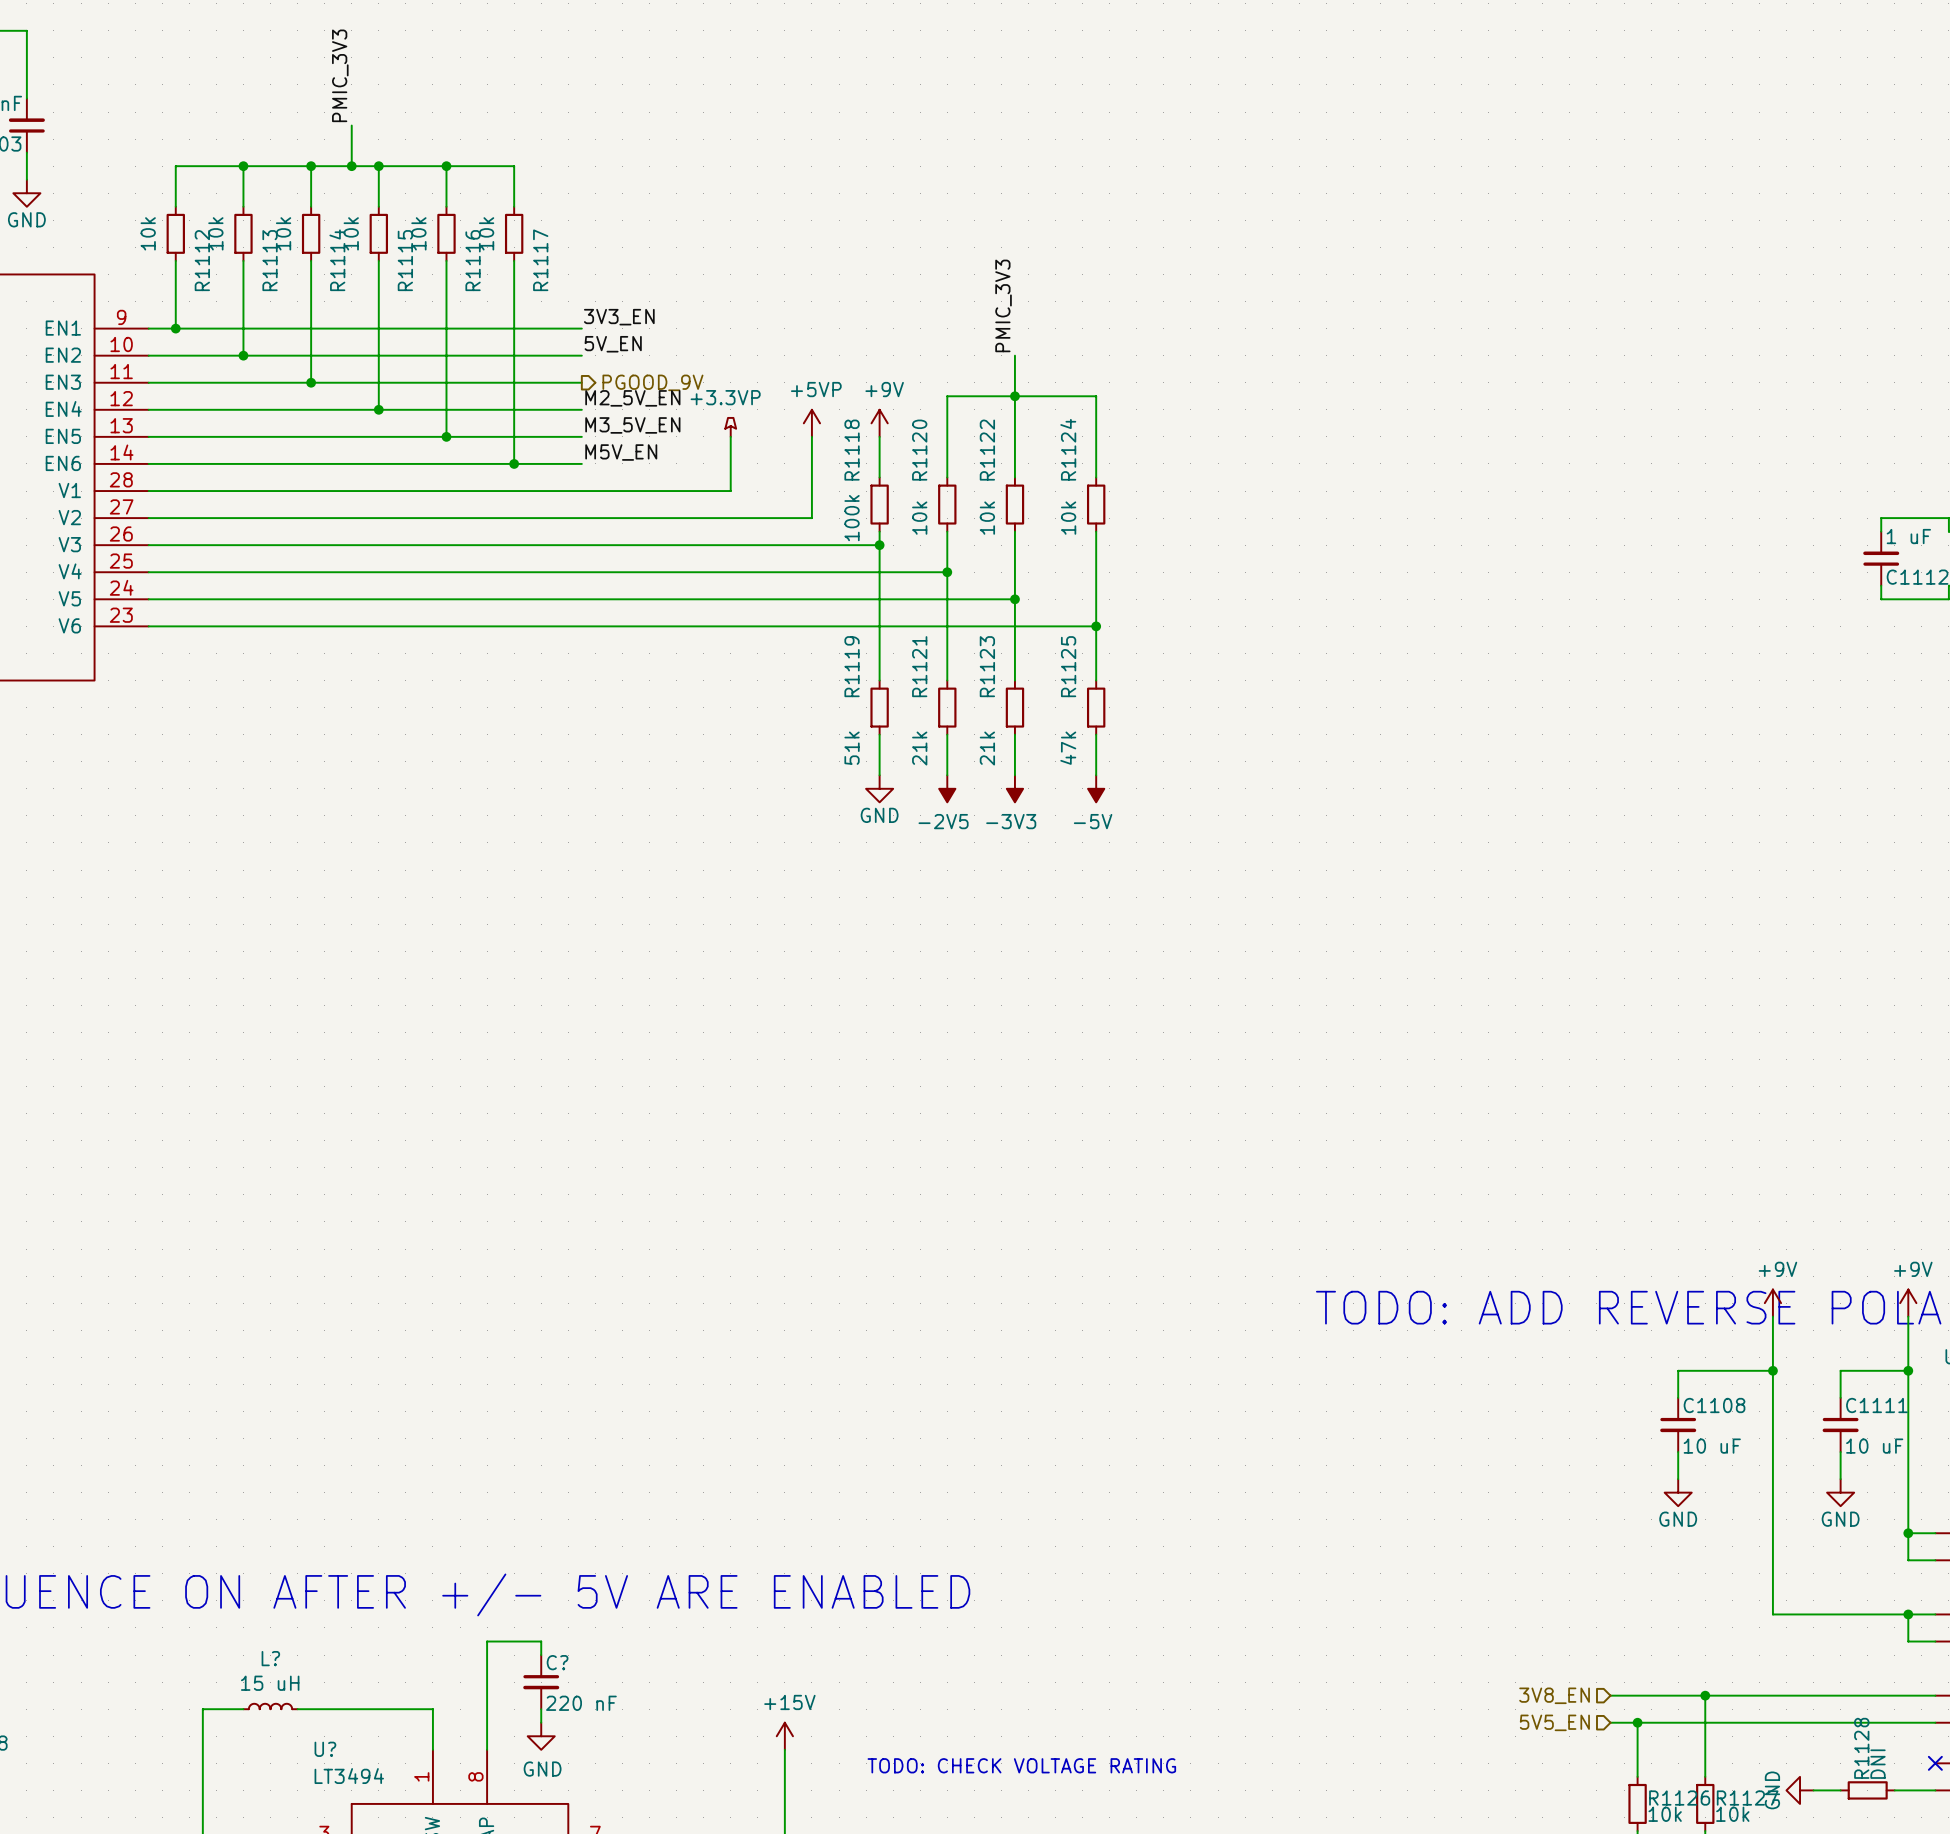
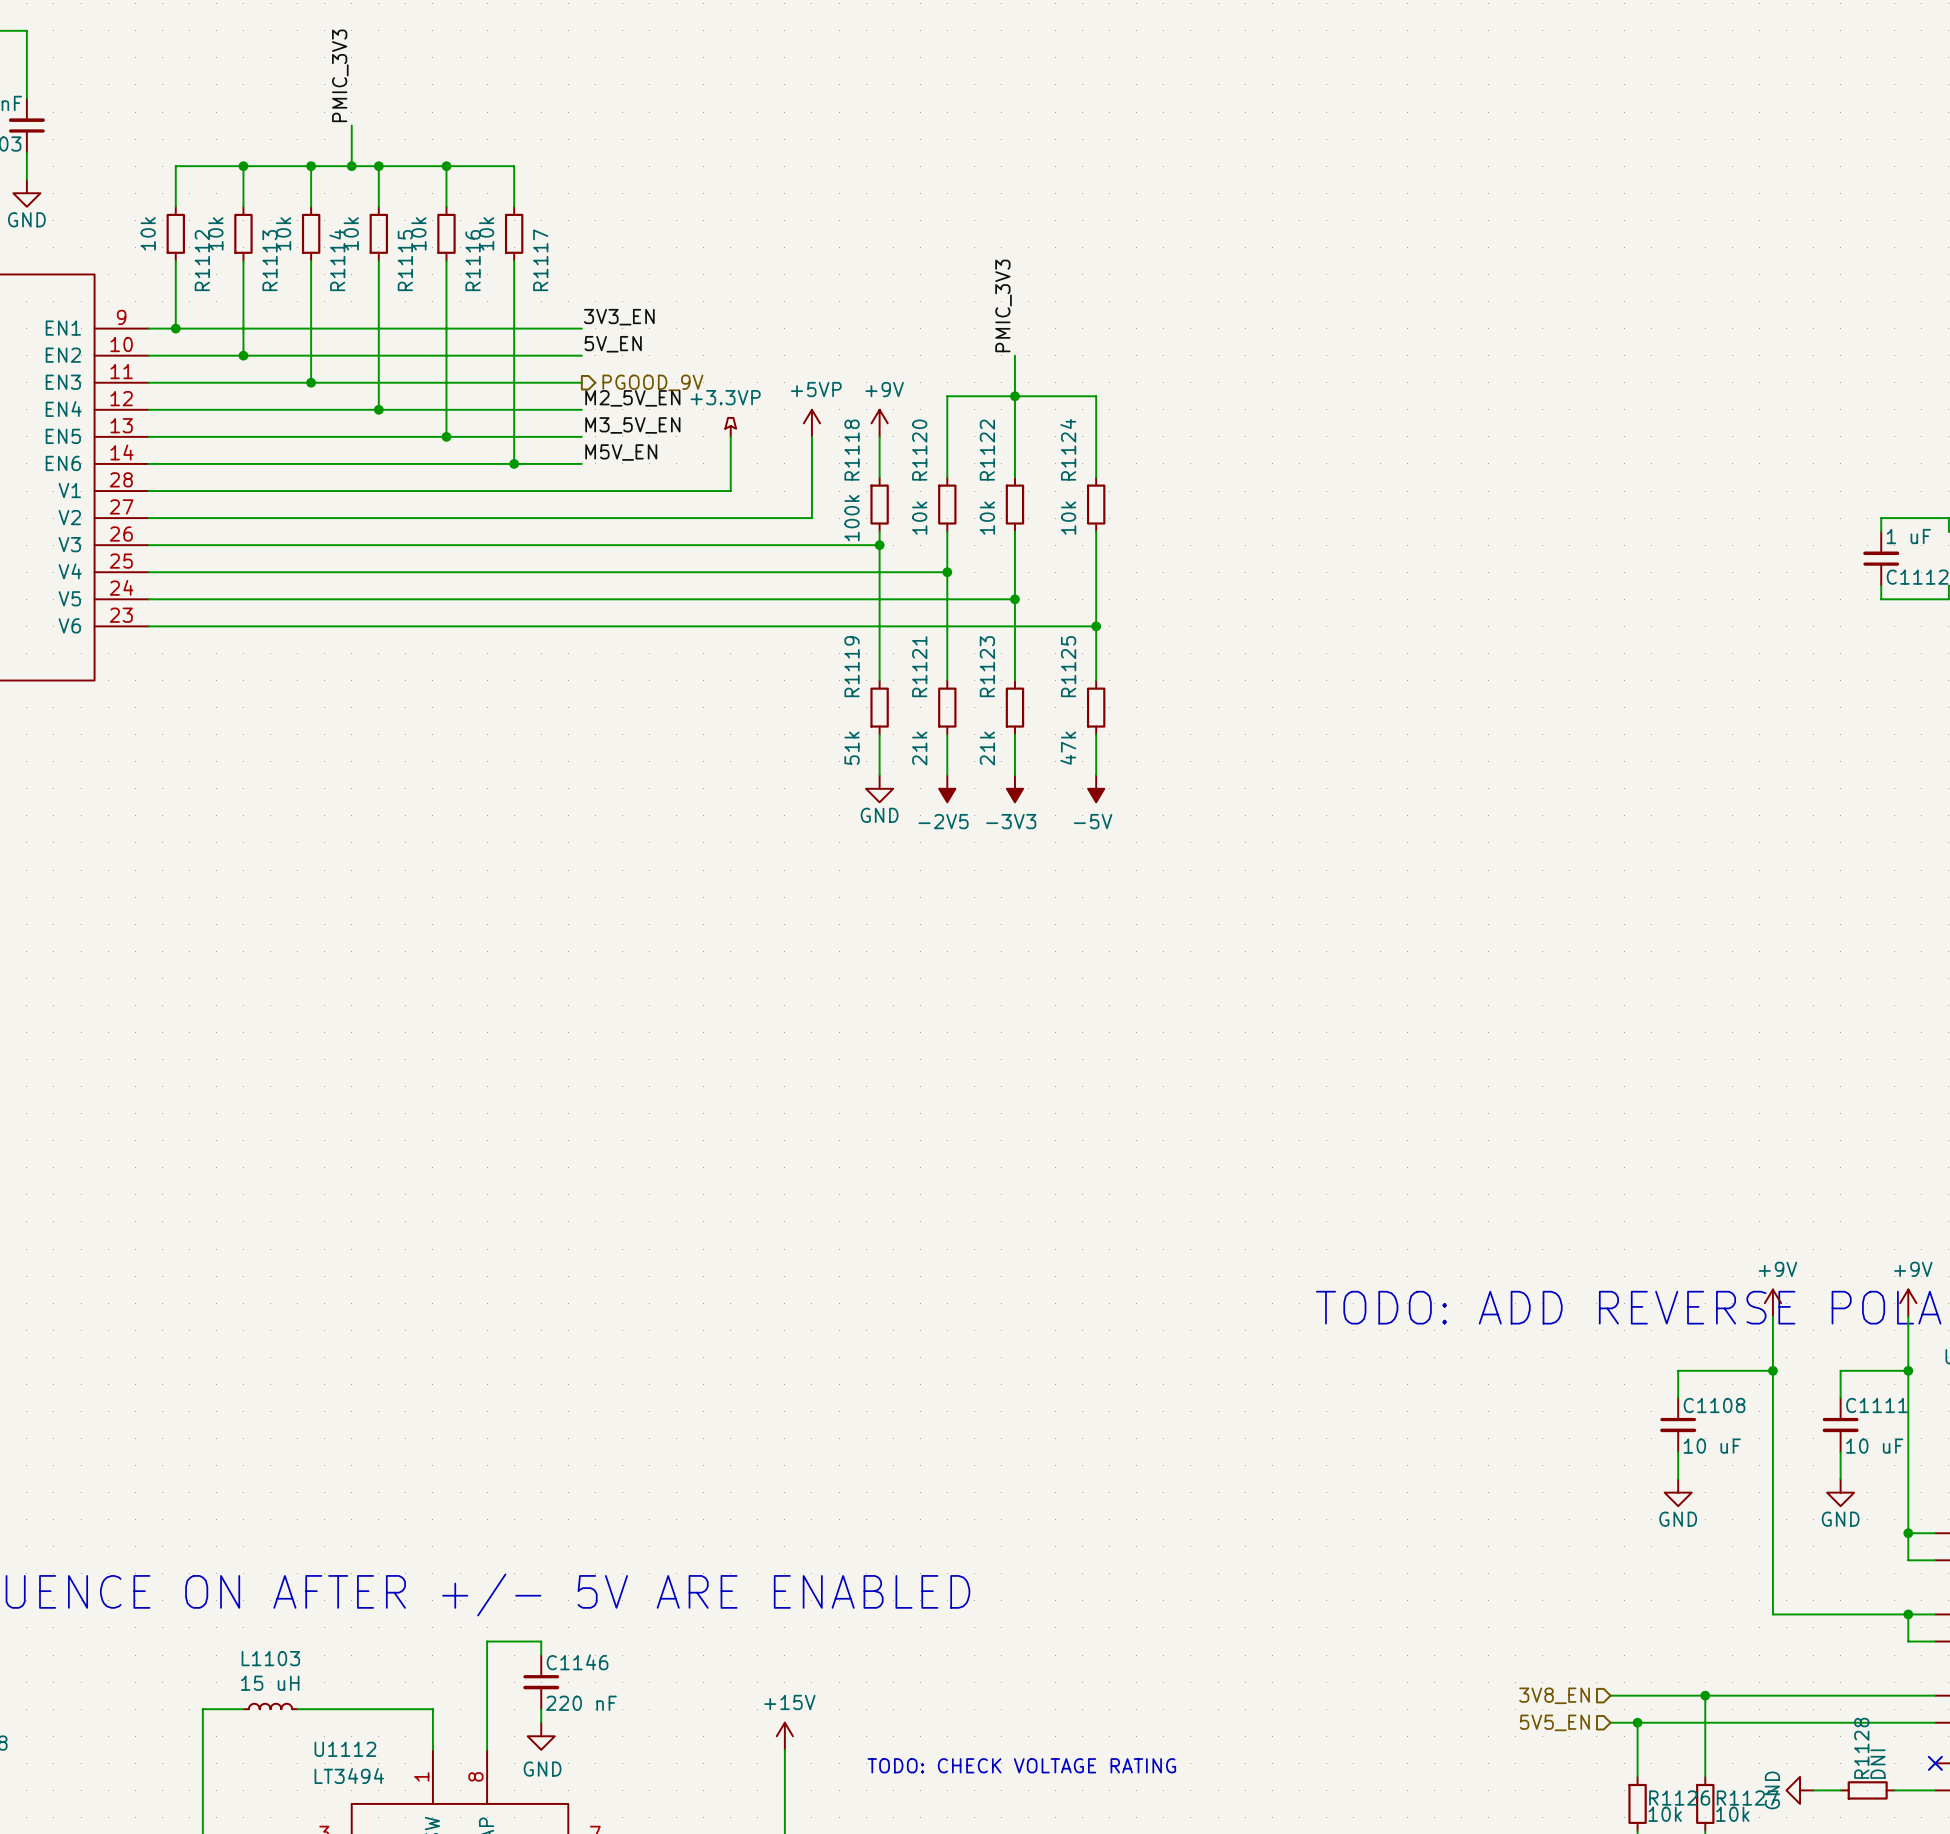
L? name: L? (270, 1658) -> L1103 (270, 1658)
C? name: C? (557, 1662) -> C1146 (577, 1662)
U? name: U? (325, 1749) -> U1112 (345, 1749)

